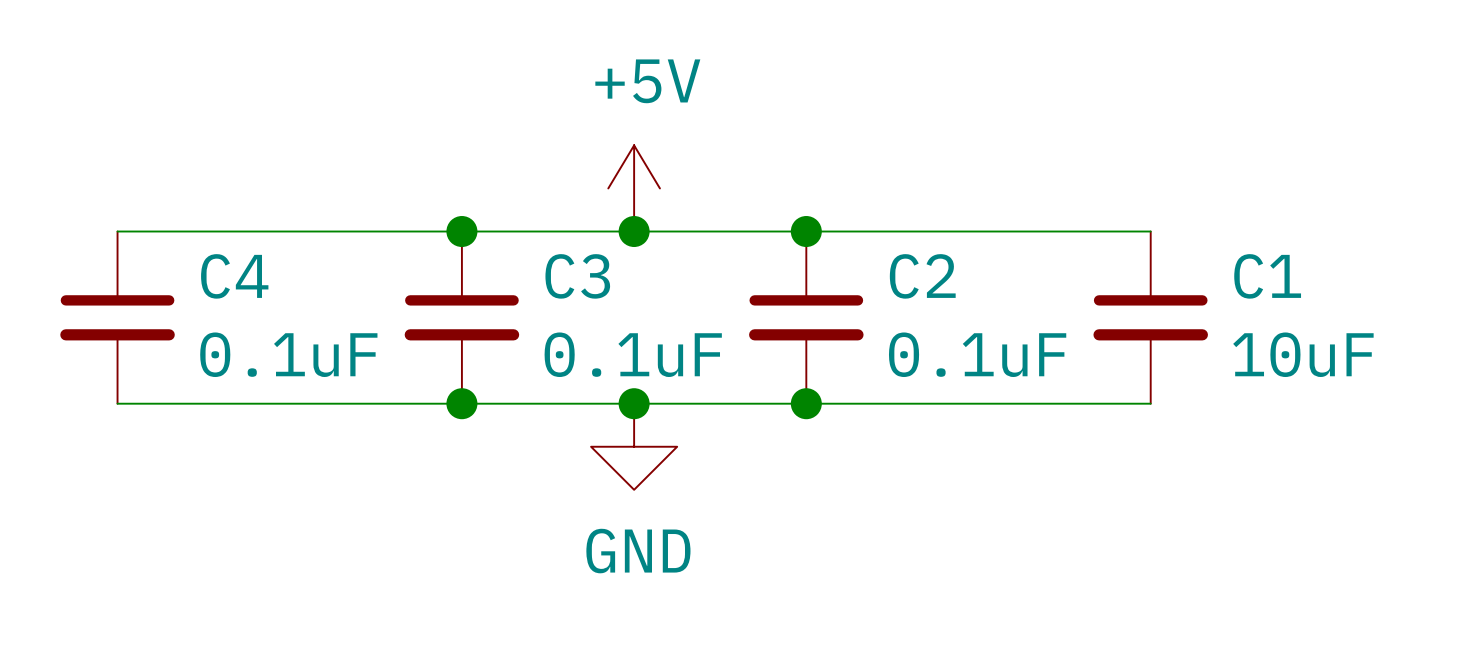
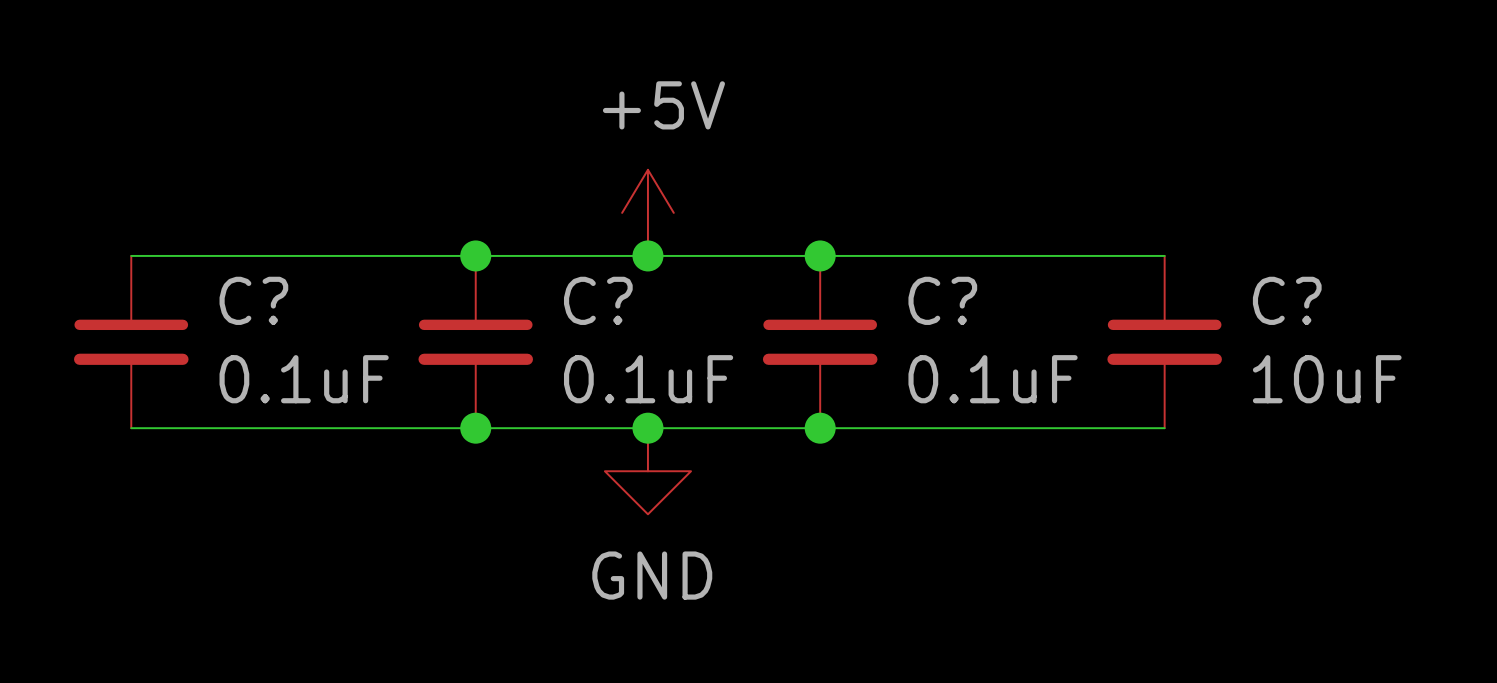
C4 name: C4 (234, 276) -> C? (253, 300)
C3 name: C3 (577, 276) -> C? (598, 300)
C2 name: C2 (922, 276) -> C? (942, 300)
C1 name: C1 (1267, 276) -> C? (1287, 300)

